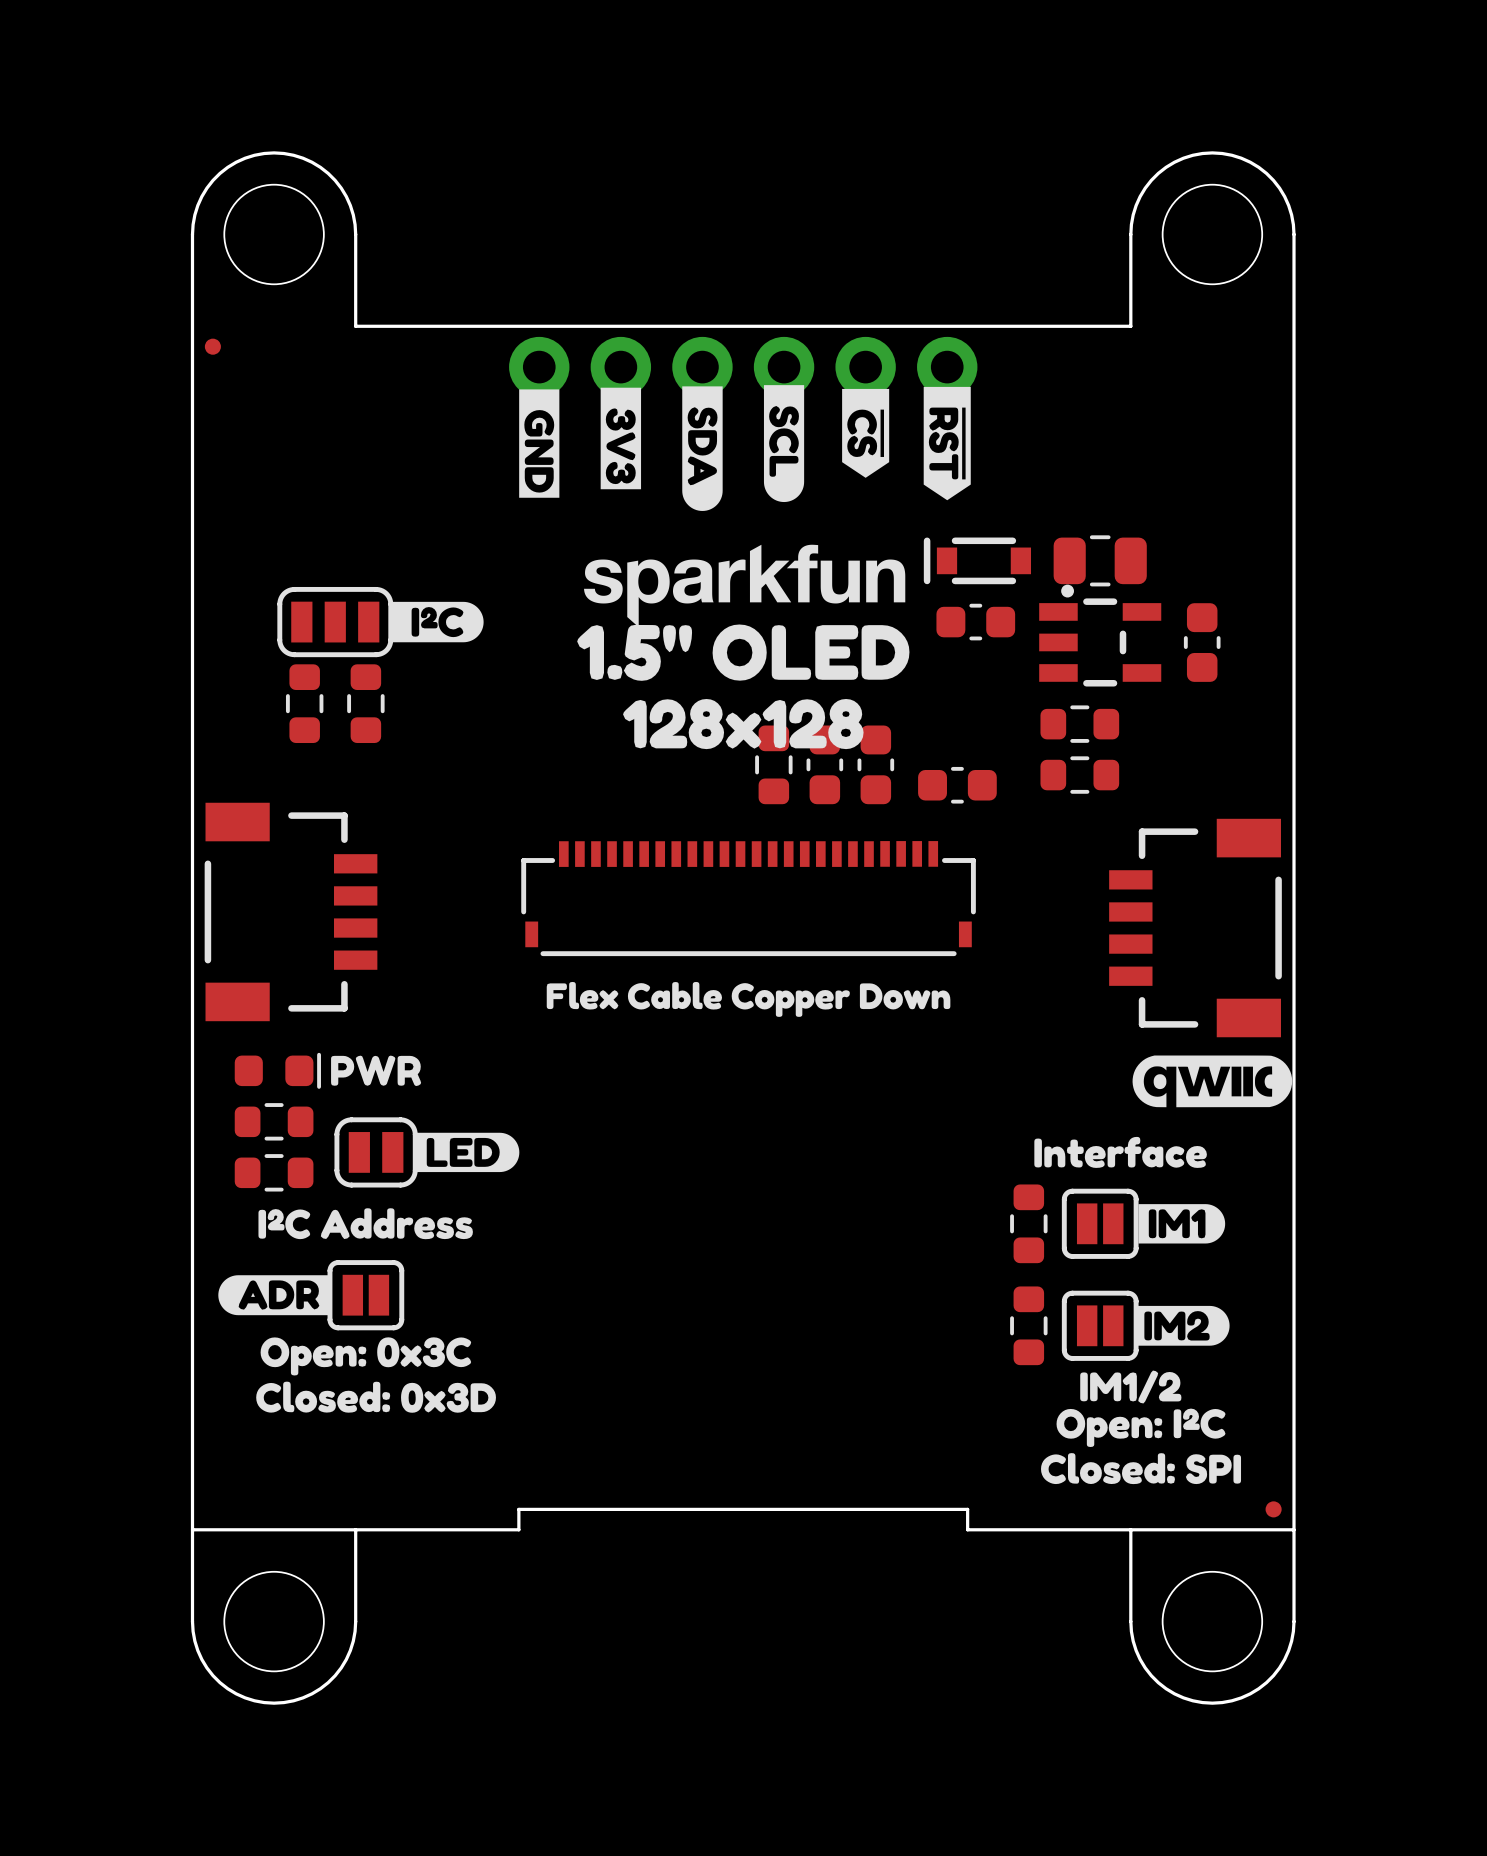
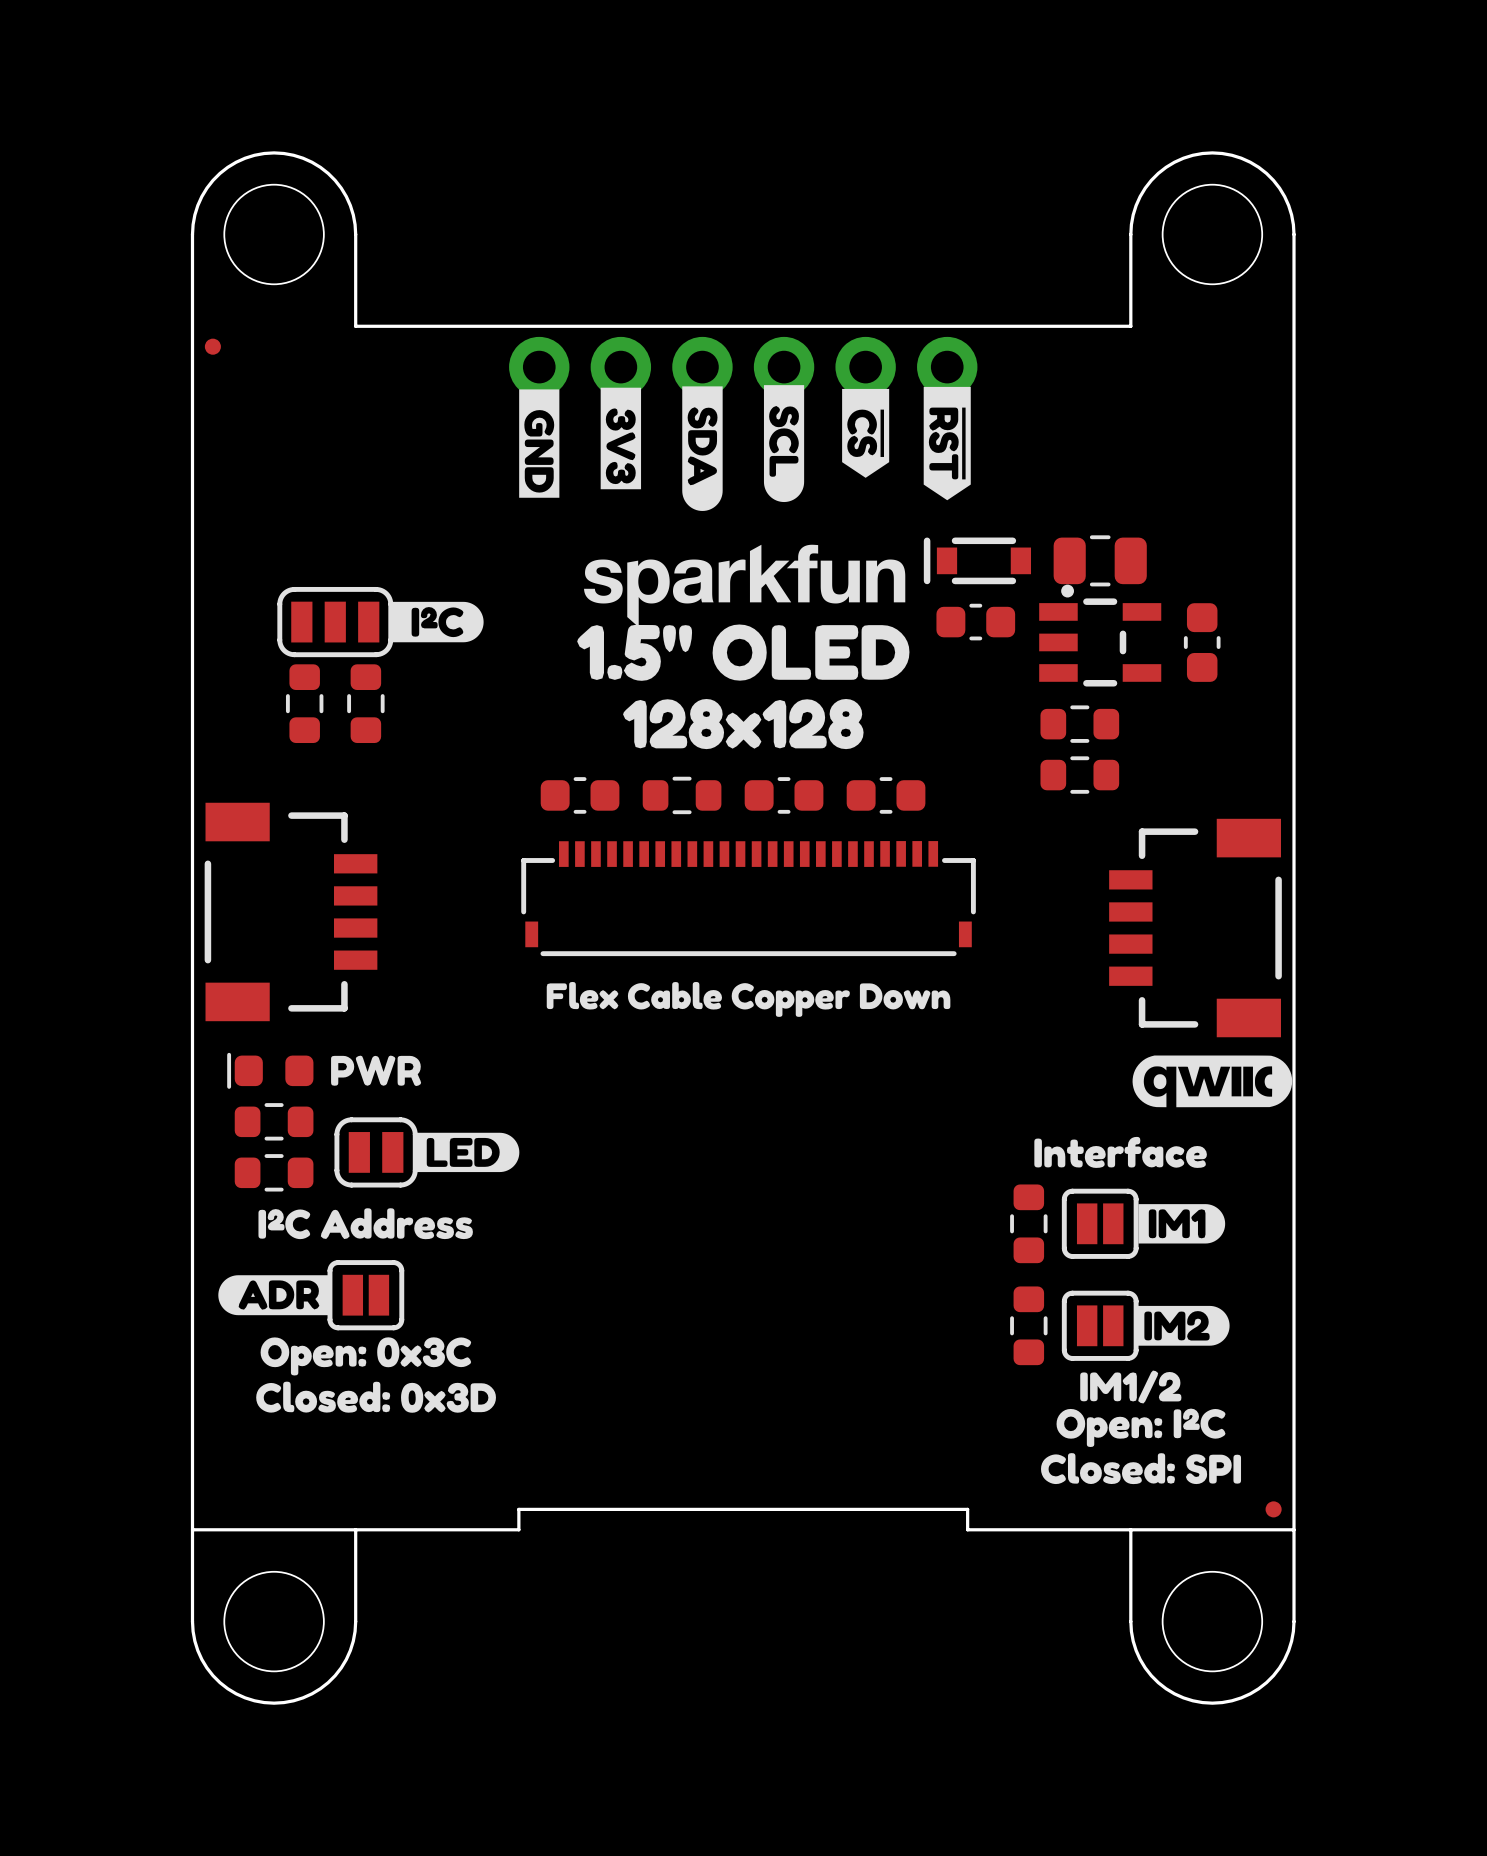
part rotation: 0° (773, 764) -> 90° clockwise (682, 795)
part position: (773, 764) -> (682, 795)
part: (824, 764) -> none
part rotation: 0° (875, 764) -> 90° clockwise (886, 795)
part: (957, 785) -> none
part: none -> (580, 795)
part: none -> (784, 795)
part rotation: 0° (277, 1070) -> 180° (270, 1070)

